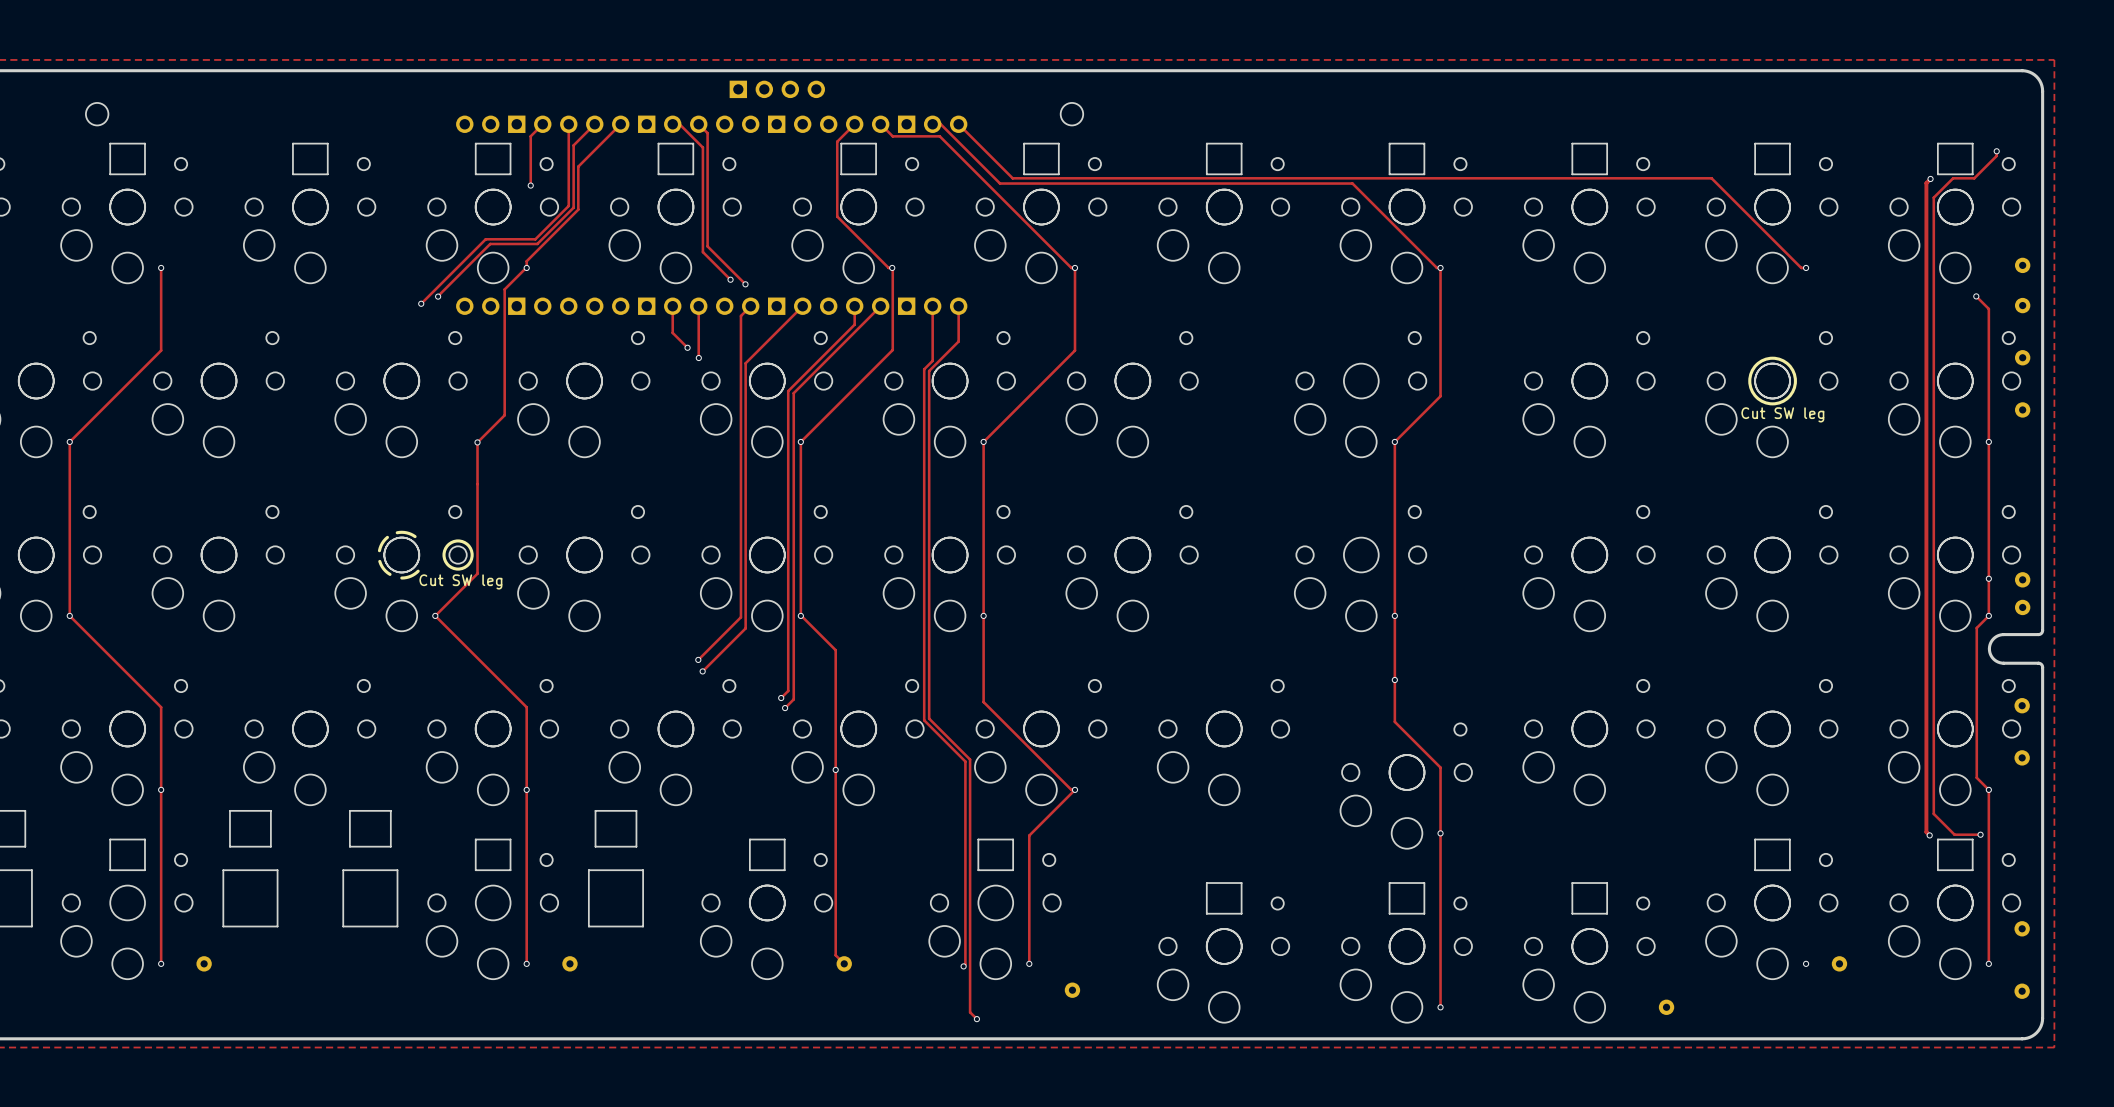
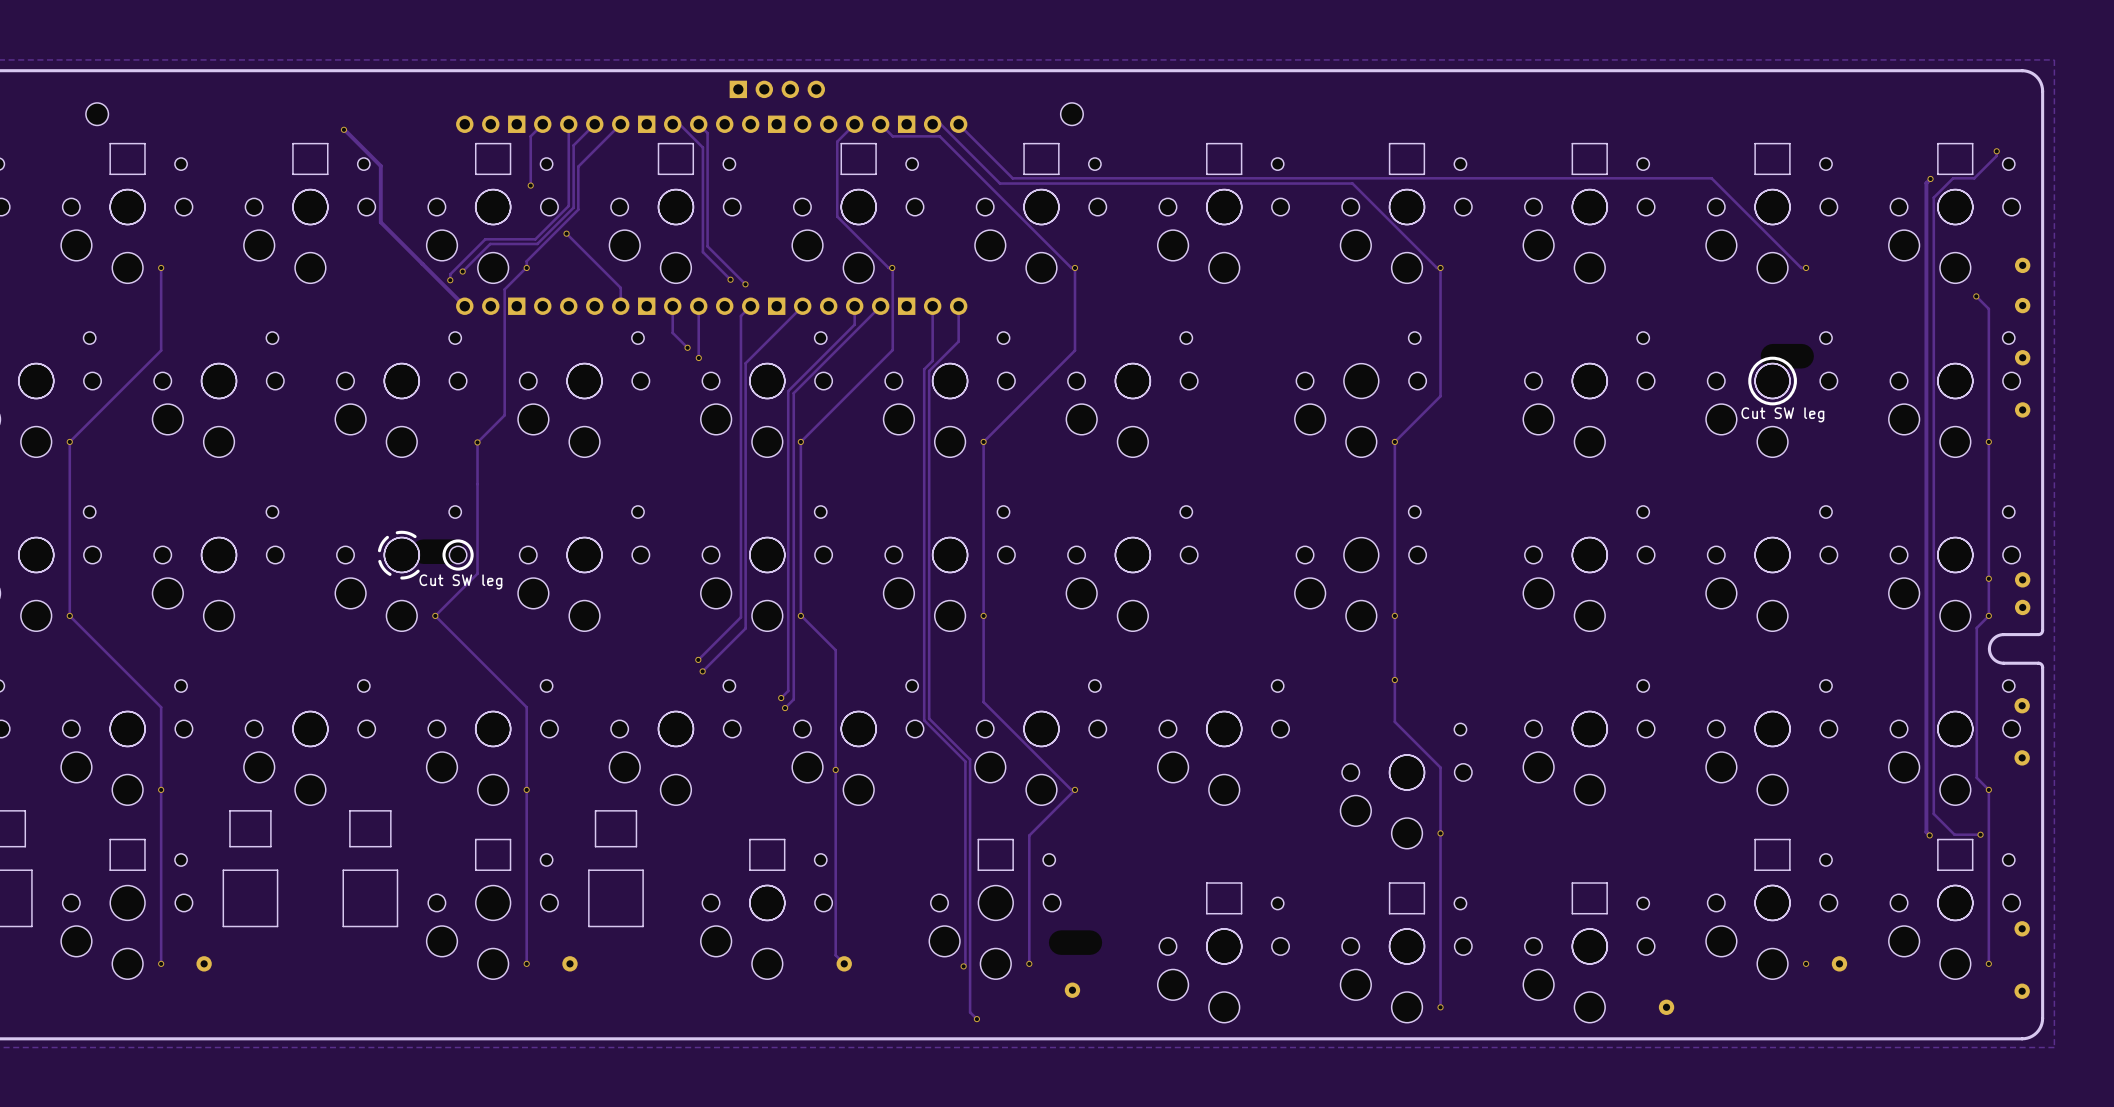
track: none -> (343, 129) (380, 166) (380, 222) (464, 306)
via: none -> (343, 129)
track: none -> (566, 233) (620, 287) (620, 306)
via: none -> (566, 233)
track: (485, 239) (421, 303) -> (485, 239) (450, 274) (450, 280)
track: (462, 271) (438, 296) -> none
via: none -> (462, 271)
via: none -> (450, 280)
via: (438, 296) -> none
via: (421, 303) -> none

